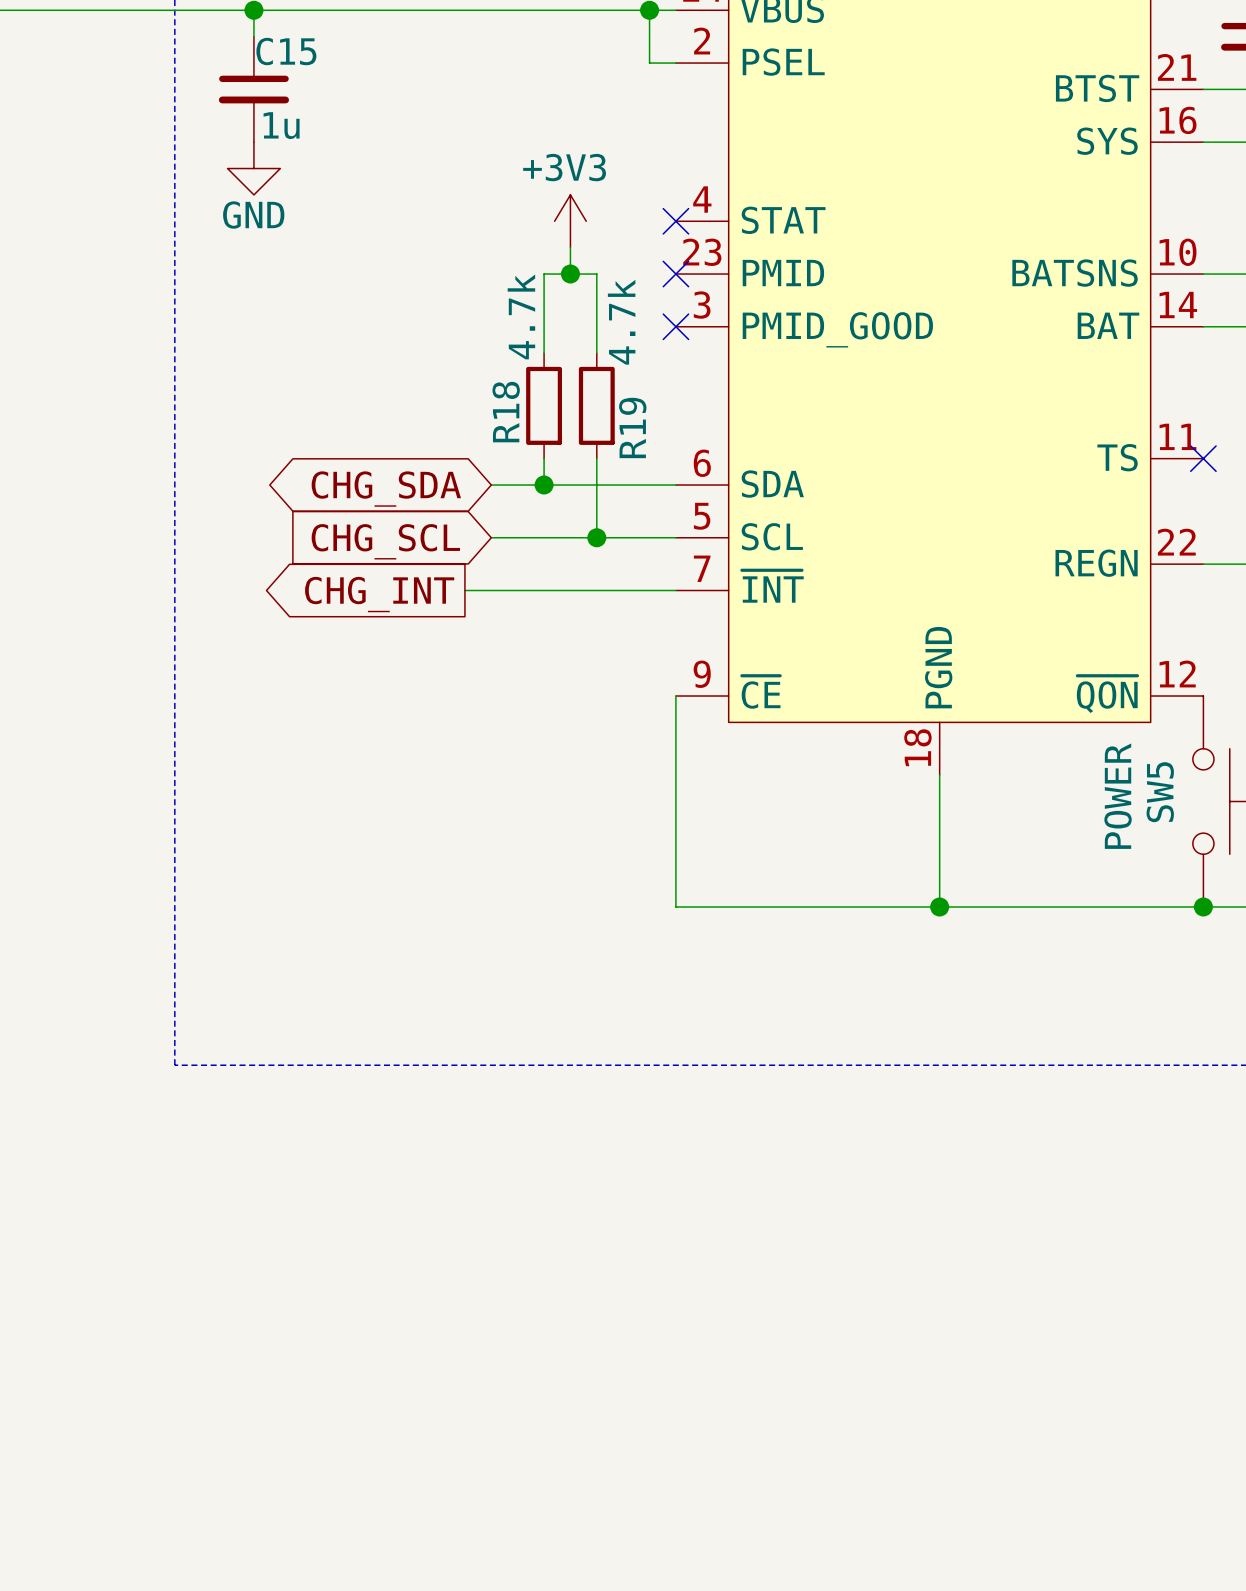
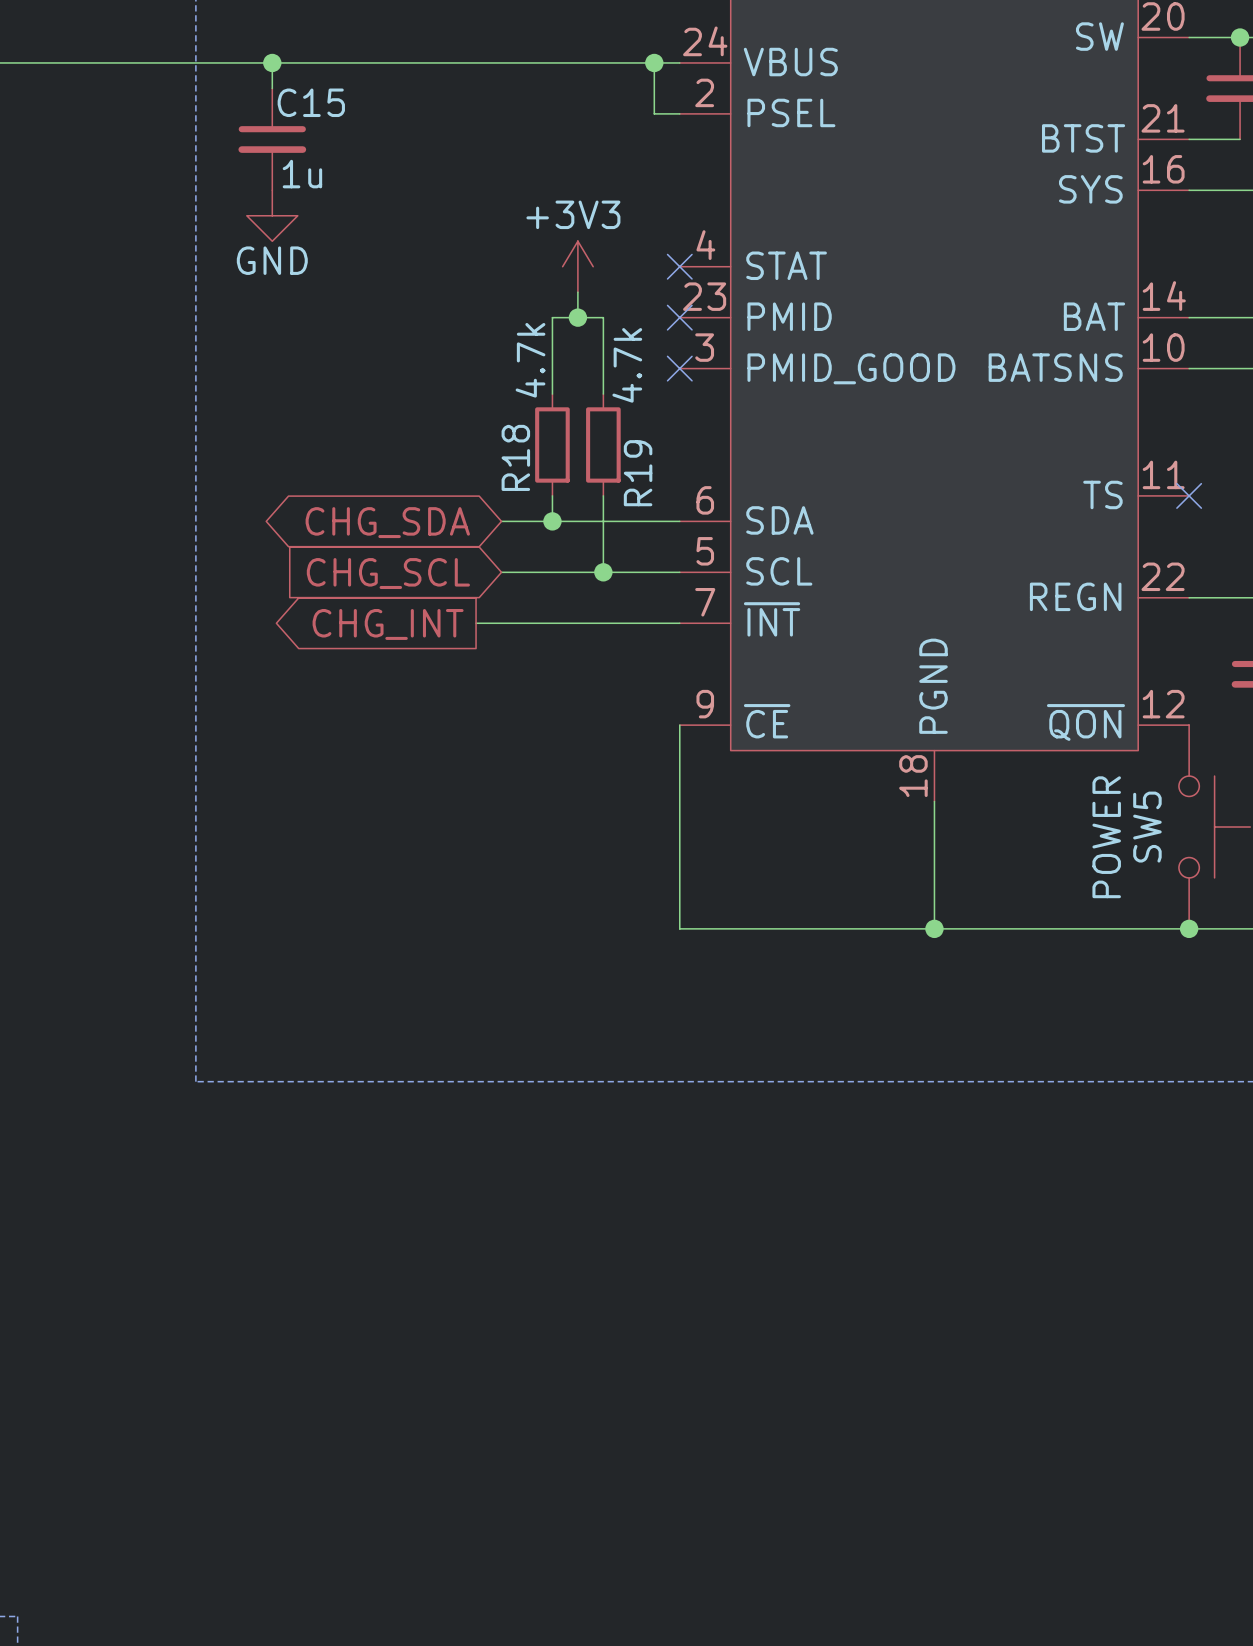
part pin number: 10 (1178, 252) -> 14 (1164, 296)
part pin name: BATSNS (1075, 273) -> BAT (1094, 316)
part pin number: 14 (1178, 305) -> 10 (1163, 347)
part pin name: BAT (1108, 325) -> BATSNS (1055, 367)

